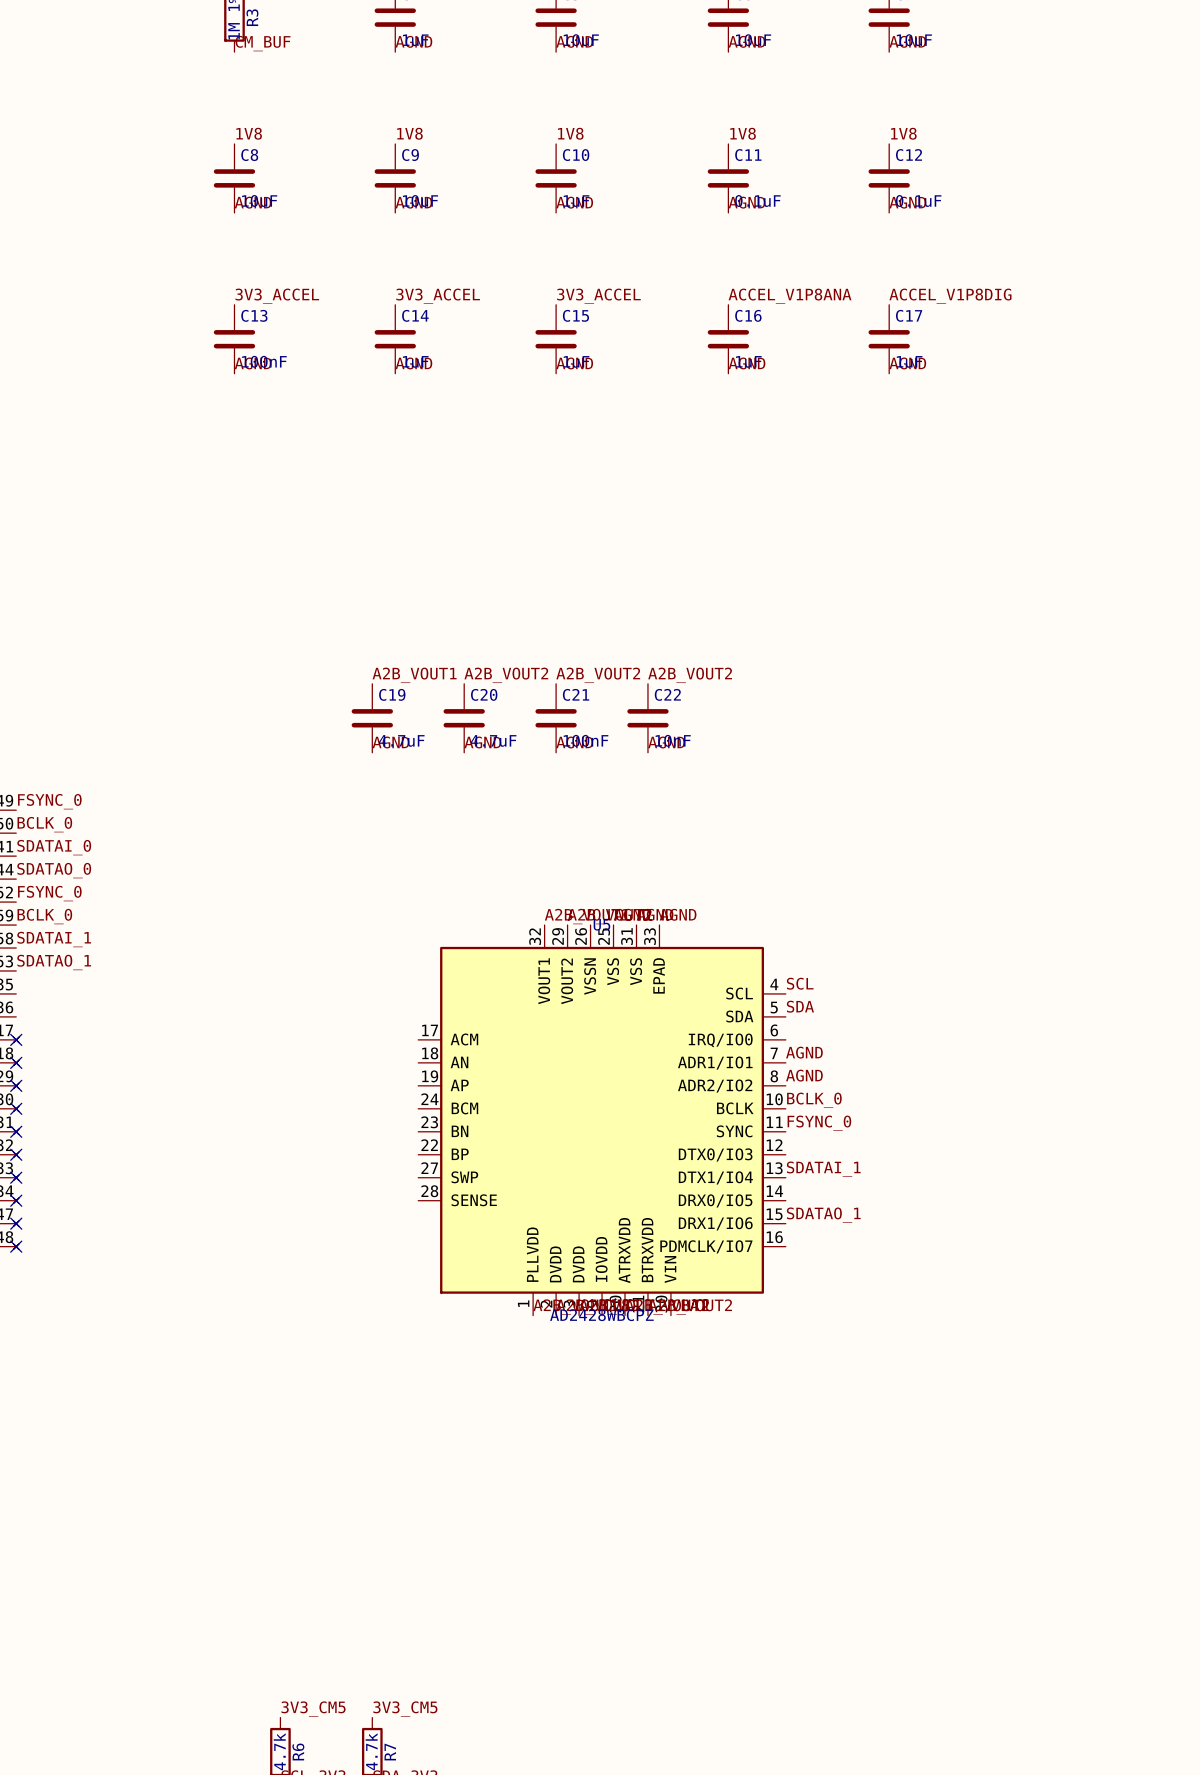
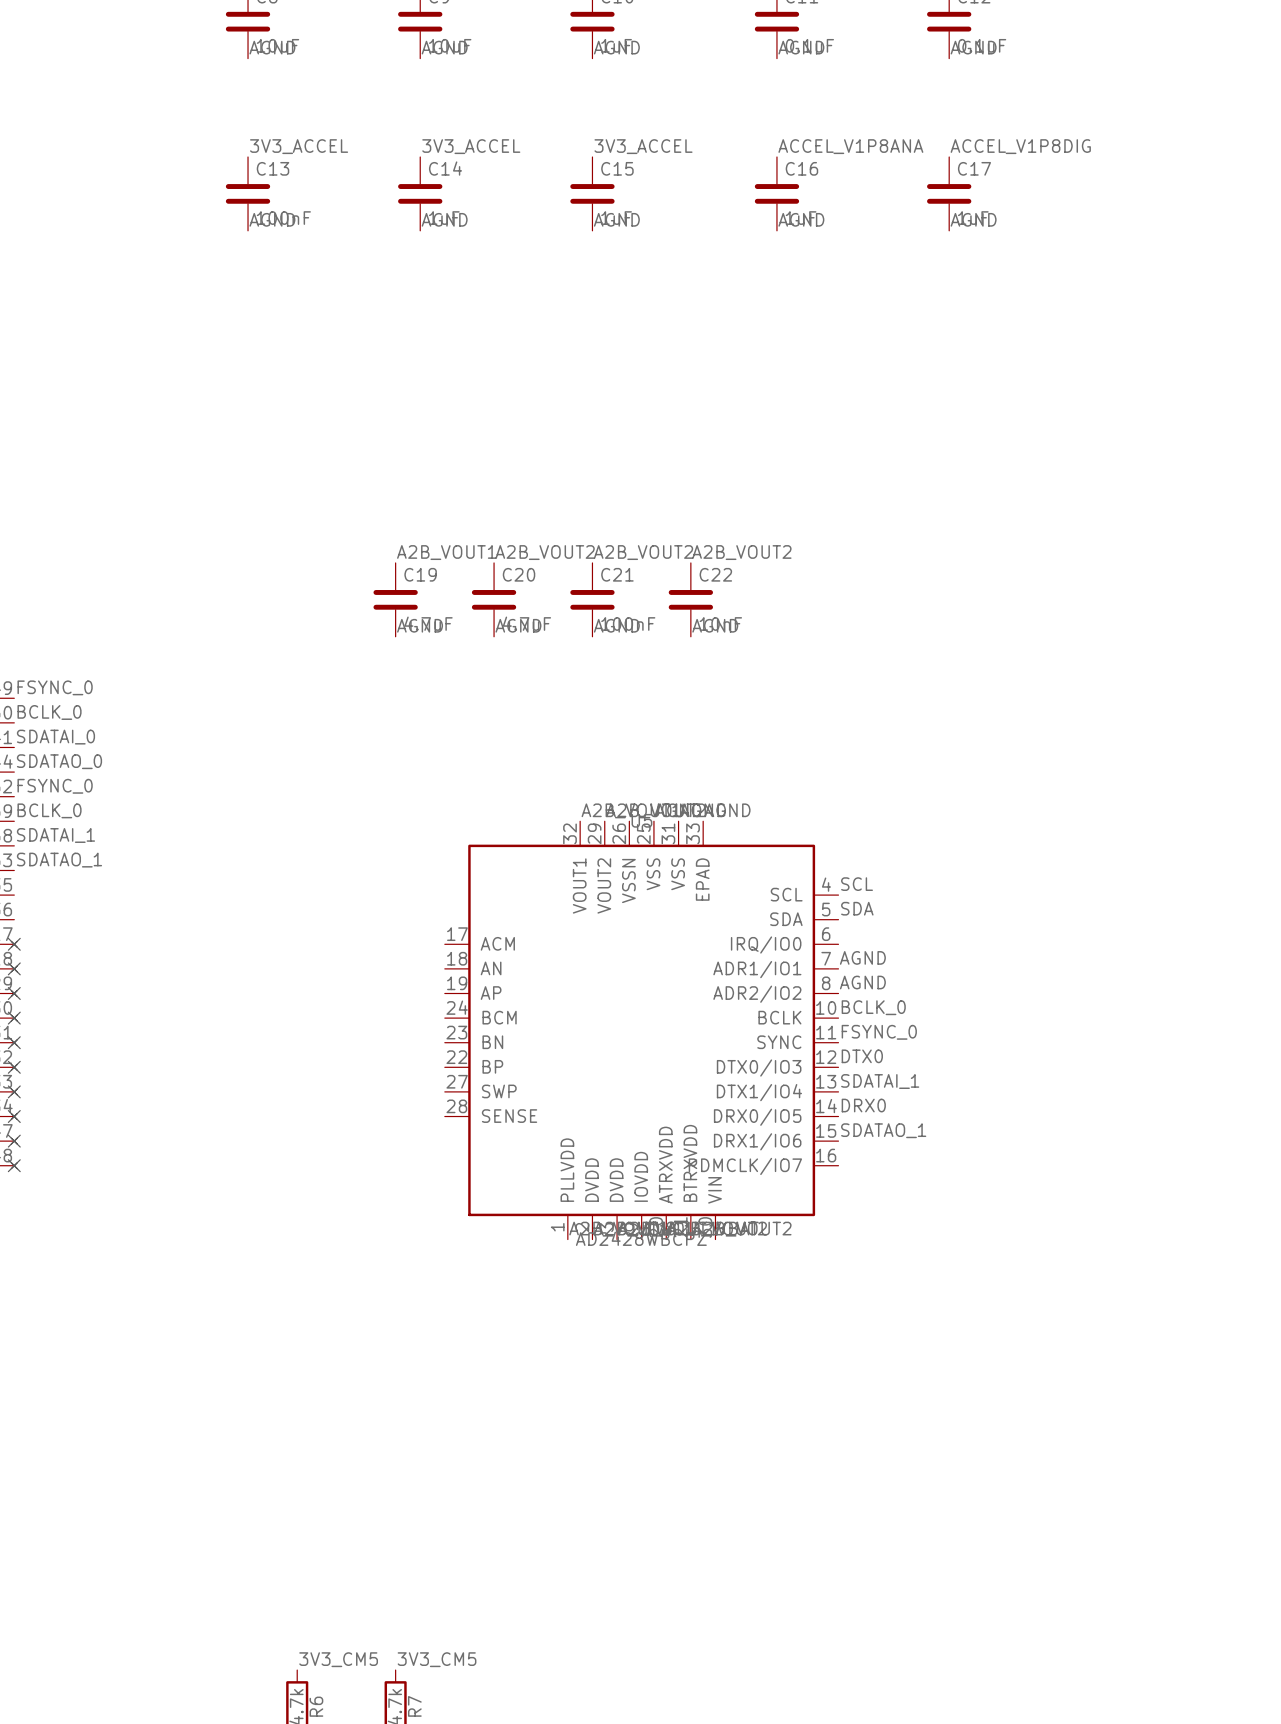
label: none -> DTX0 (862, 1056)
label: none -> DRX0 (863, 1105)

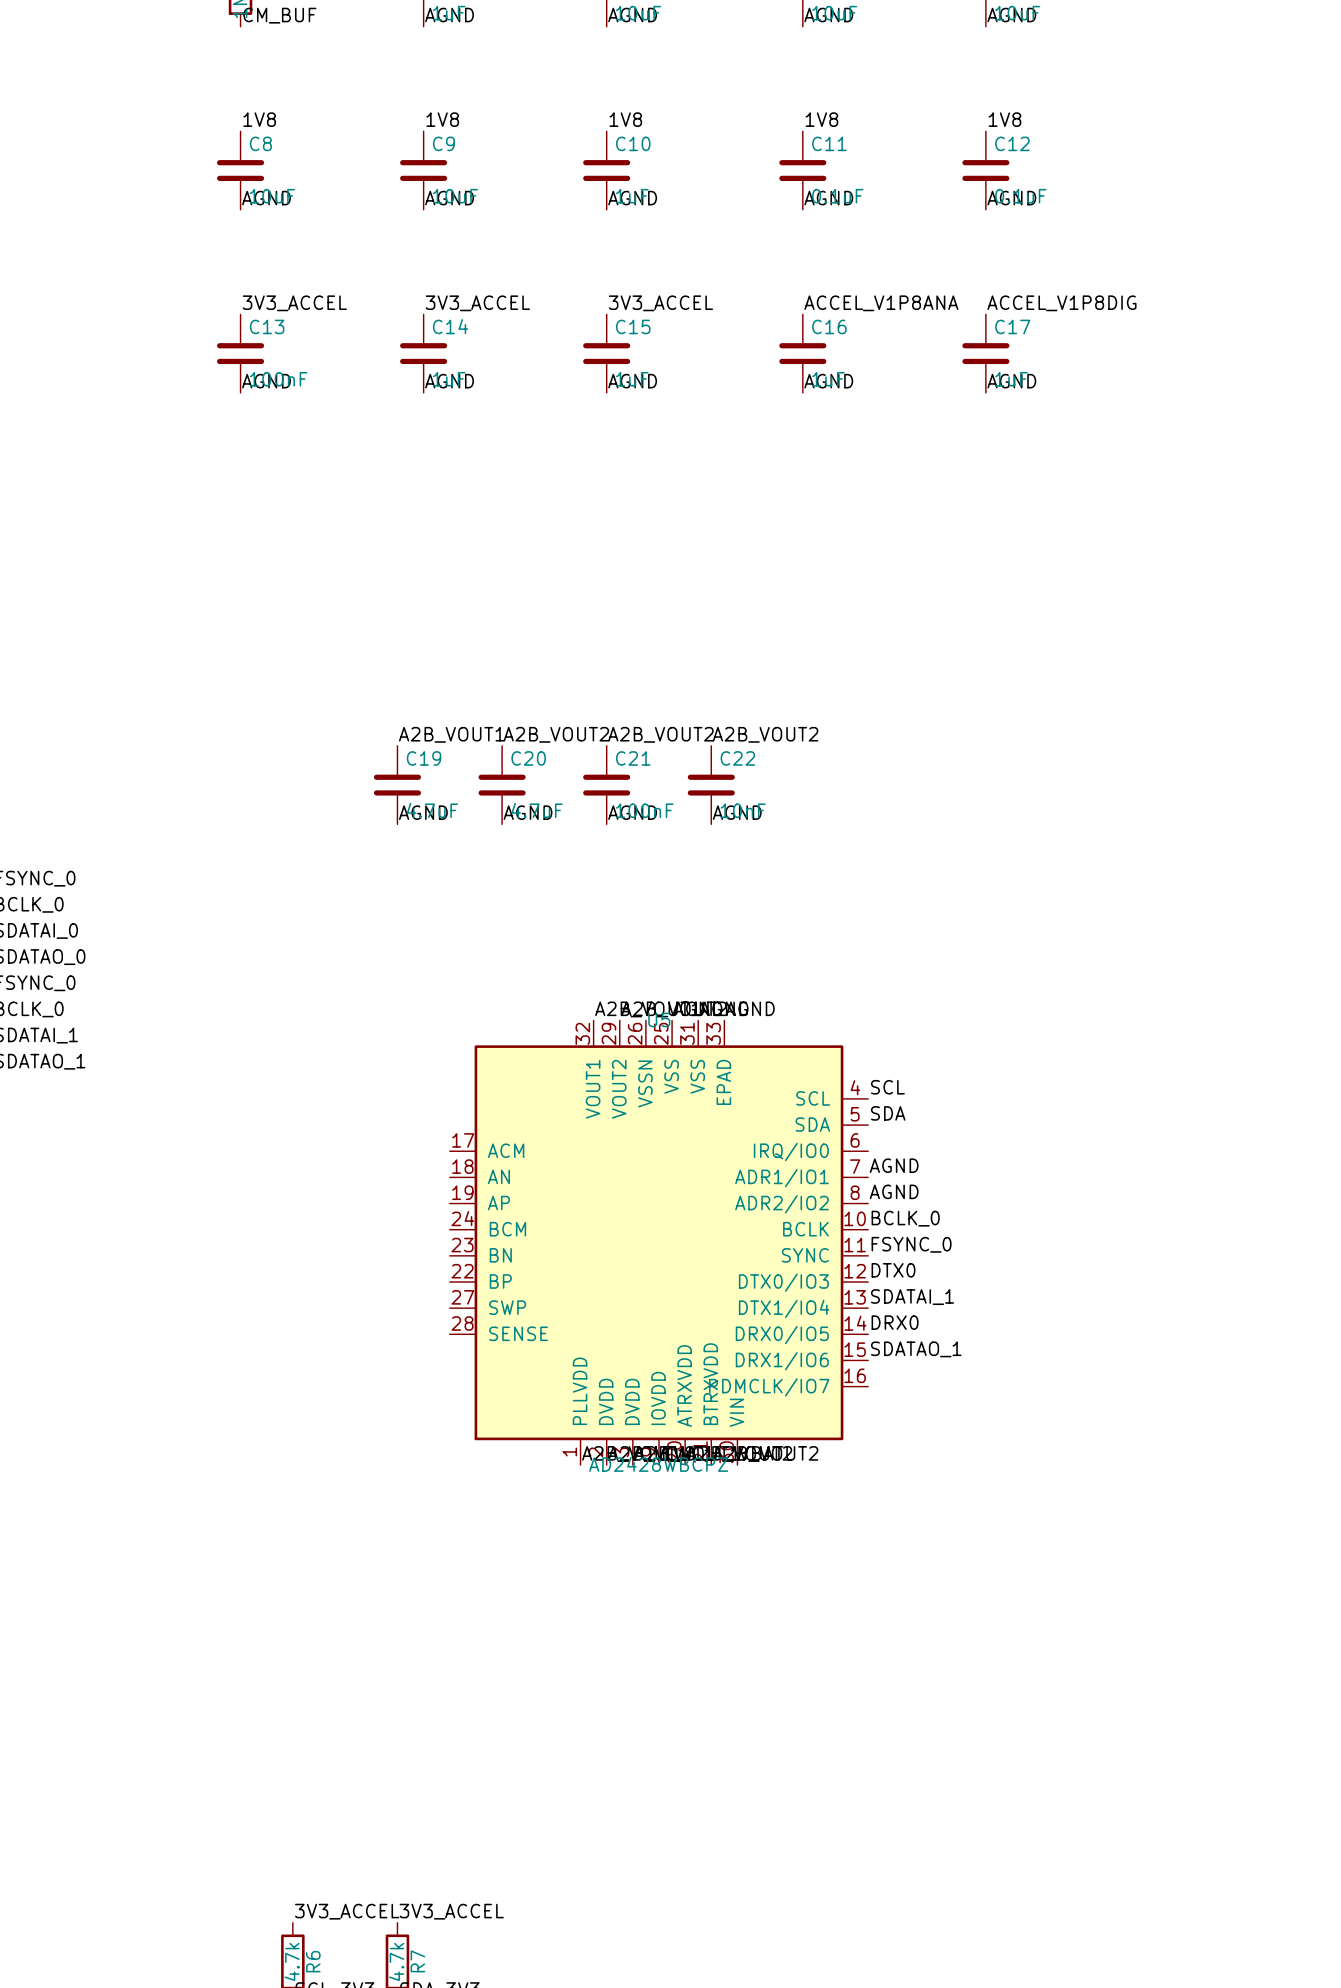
label: 3V3_CM5 (338, 1659) -> 3V3_ACCEL (347, 1911)
label: 3V3_CM5 (437, 1659) -> 3V3_ACCEL (451, 1911)

